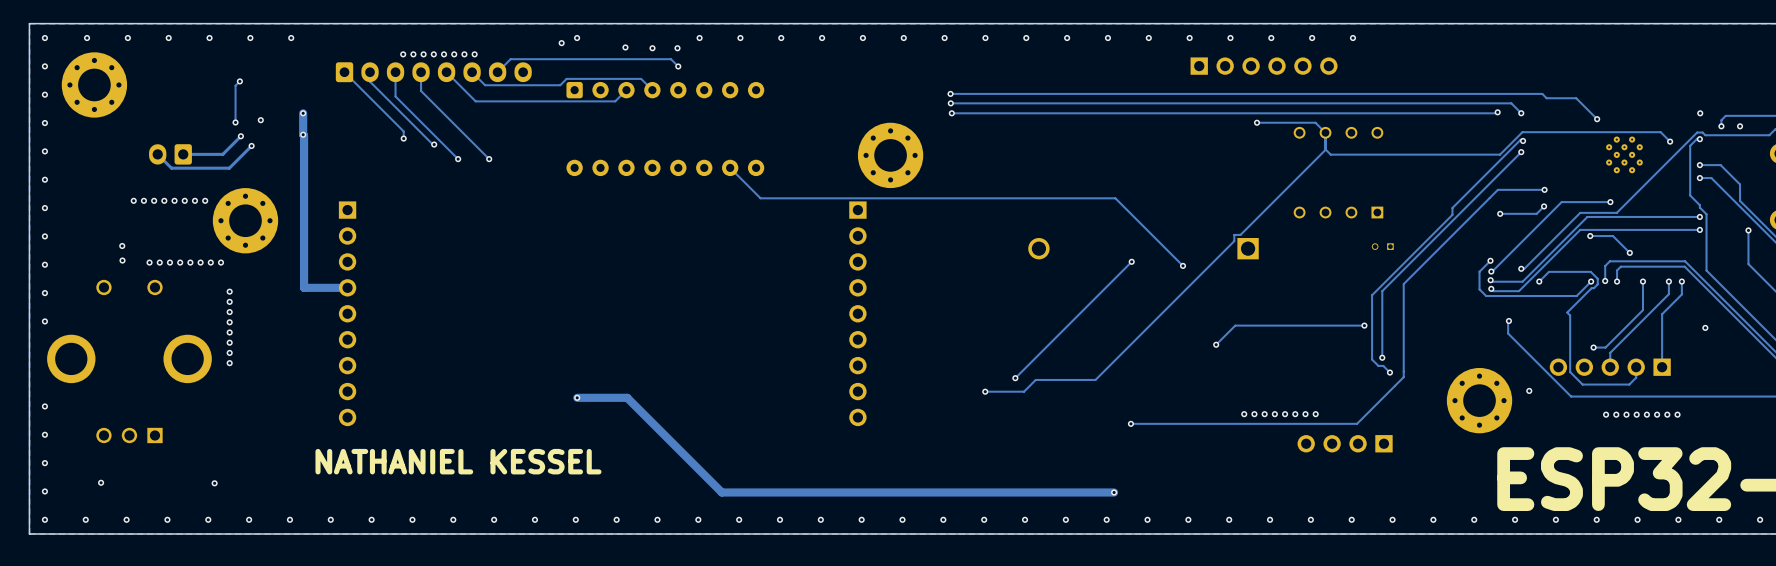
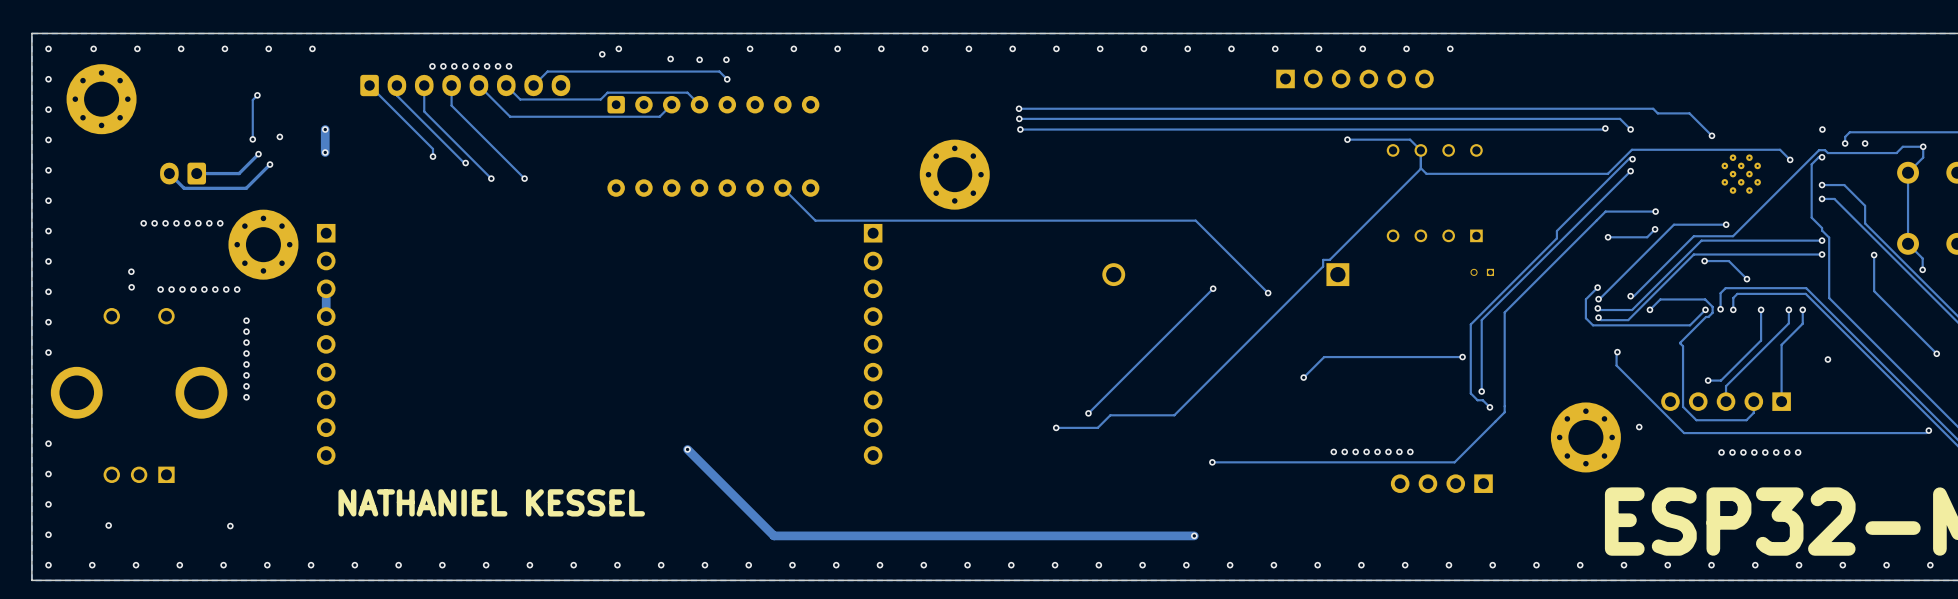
track: (303, 134) (304, 261) -> none
track: (347, 287) (304, 287) -> none
part position: (347, 313) -> (326, 344)
part position: (857, 313) -> (873, 344)
track: (577, 397) (627, 397) (641, 411) -> none
via: (577, 397) -> none
via: none -> (687, 449)

